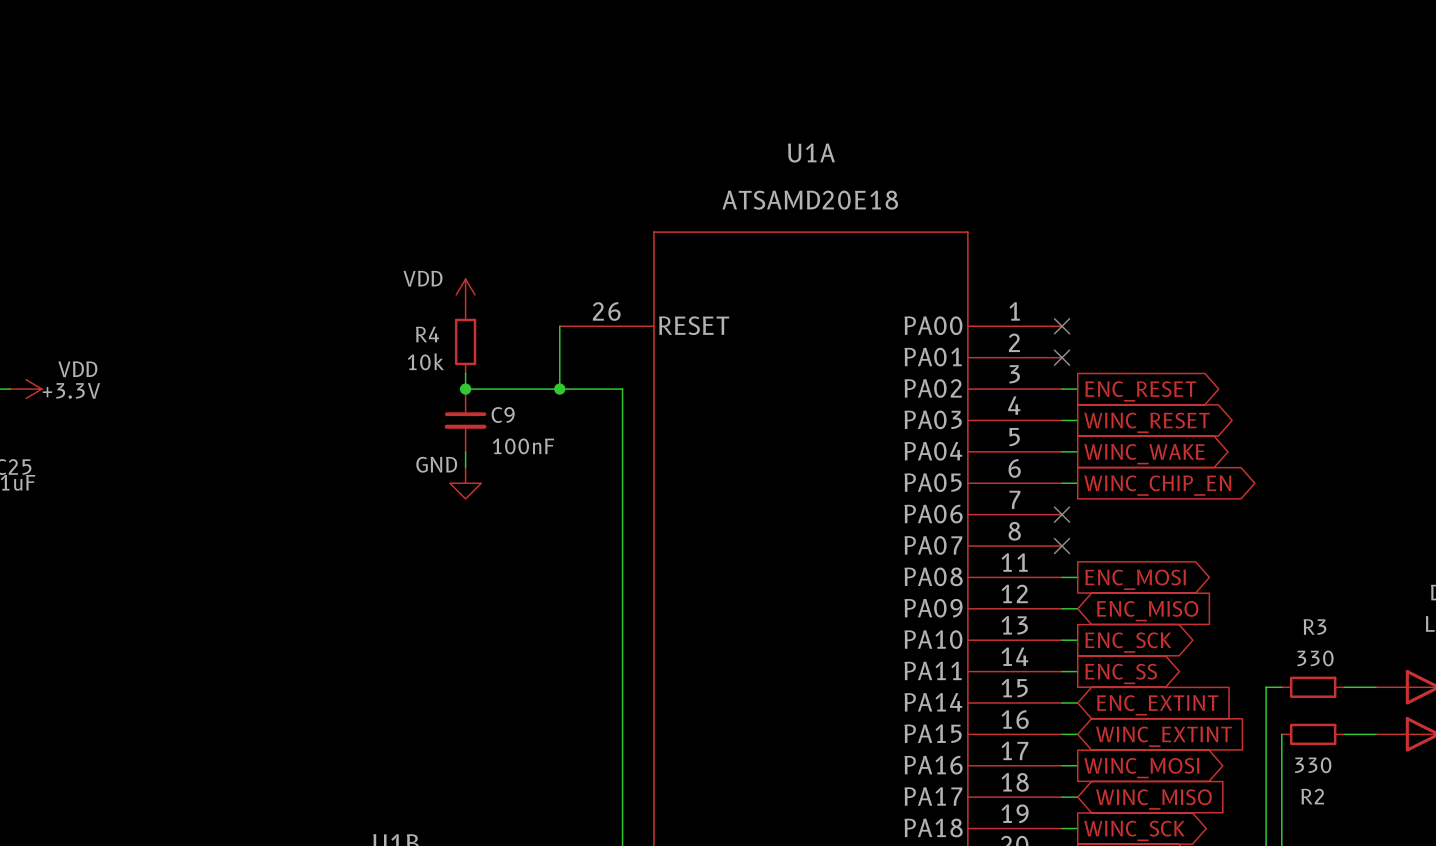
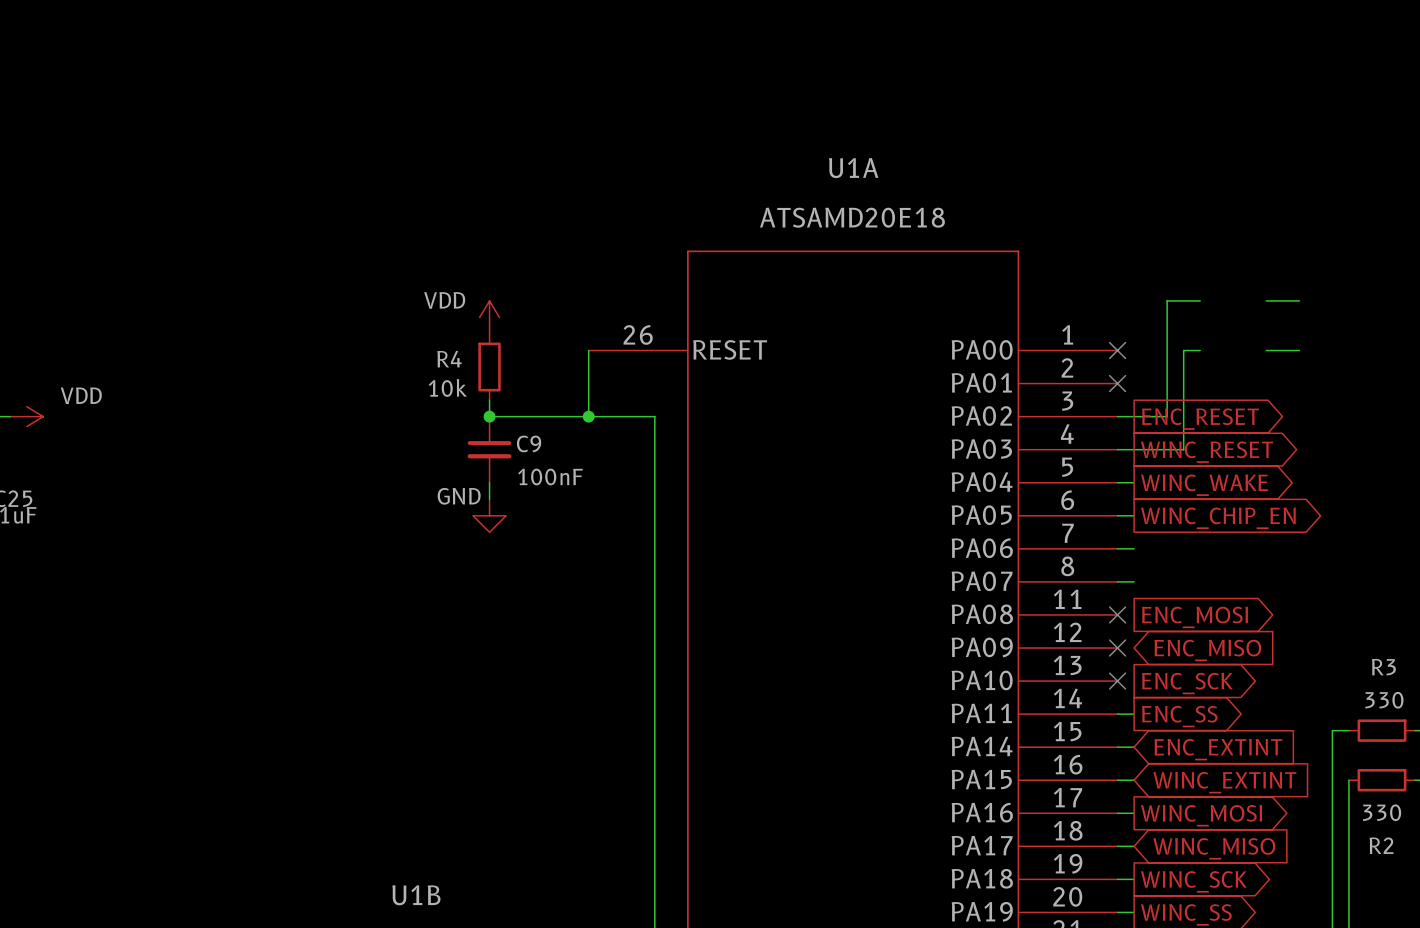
wire: none -> (1200, 300) (1167, 300) (1167, 416) (1134, 416)
wire: none -> (1266, 300) (1299, 300)
wire: none -> (1200, 350) (1183, 350) (1183, 449) (1134, 449)
wire: none -> (1266, 350) (1299, 350)
label: +3.3V (71, 390) -> none
no-connect mark: (1062, 514) -> none
no-connect mark: (1062, 546) -> none
wire: (1062, 577) (1077, 577) -> (1117, 548) (1134, 548)
no-connect mark: none -> (1117, 614)
wire: (1062, 608) (1077, 608) -> (1117, 581) (1134, 581)
no-connect mark: none -> (1117, 648)
wire: (1062, 640) (1077, 640) -> none
no-connect mark: none -> (1117, 681)

